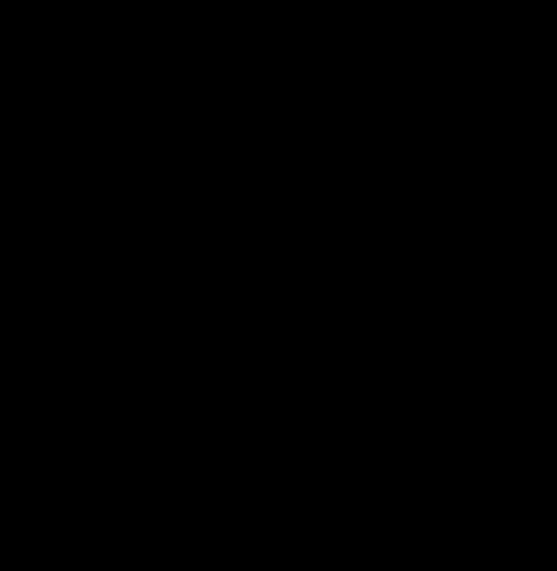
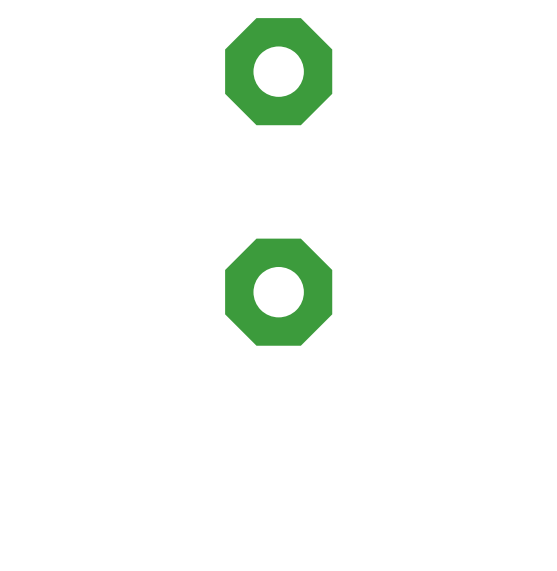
part: none -> (278, 71)
part: none -> (278, 292)

